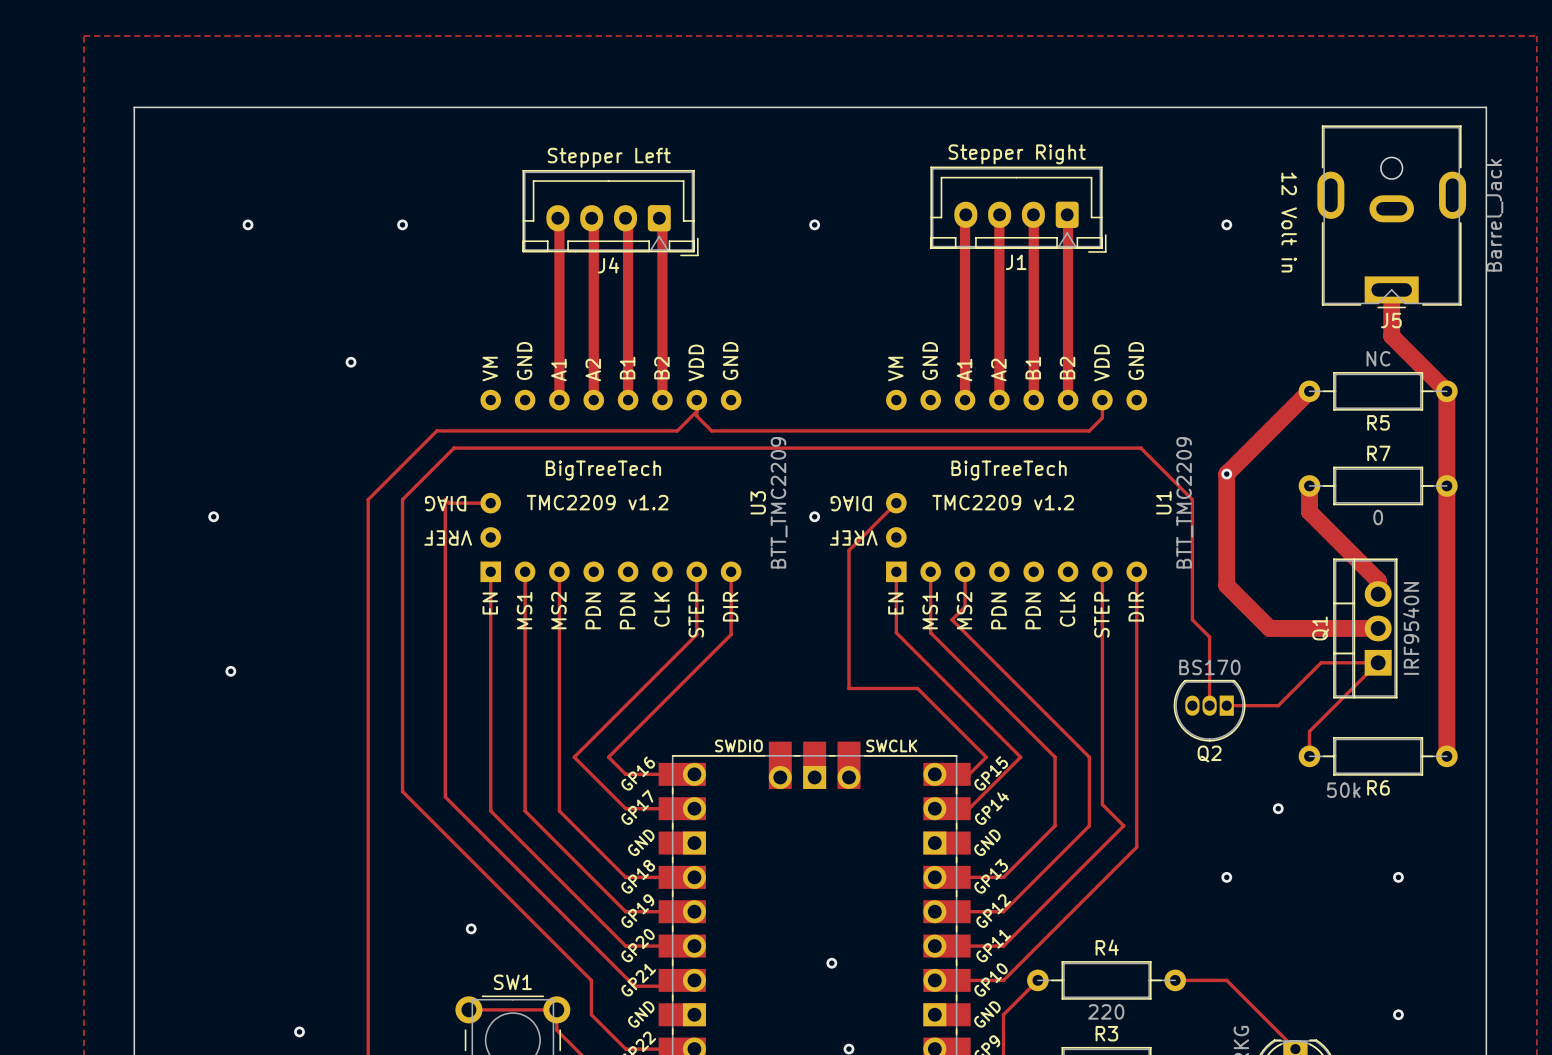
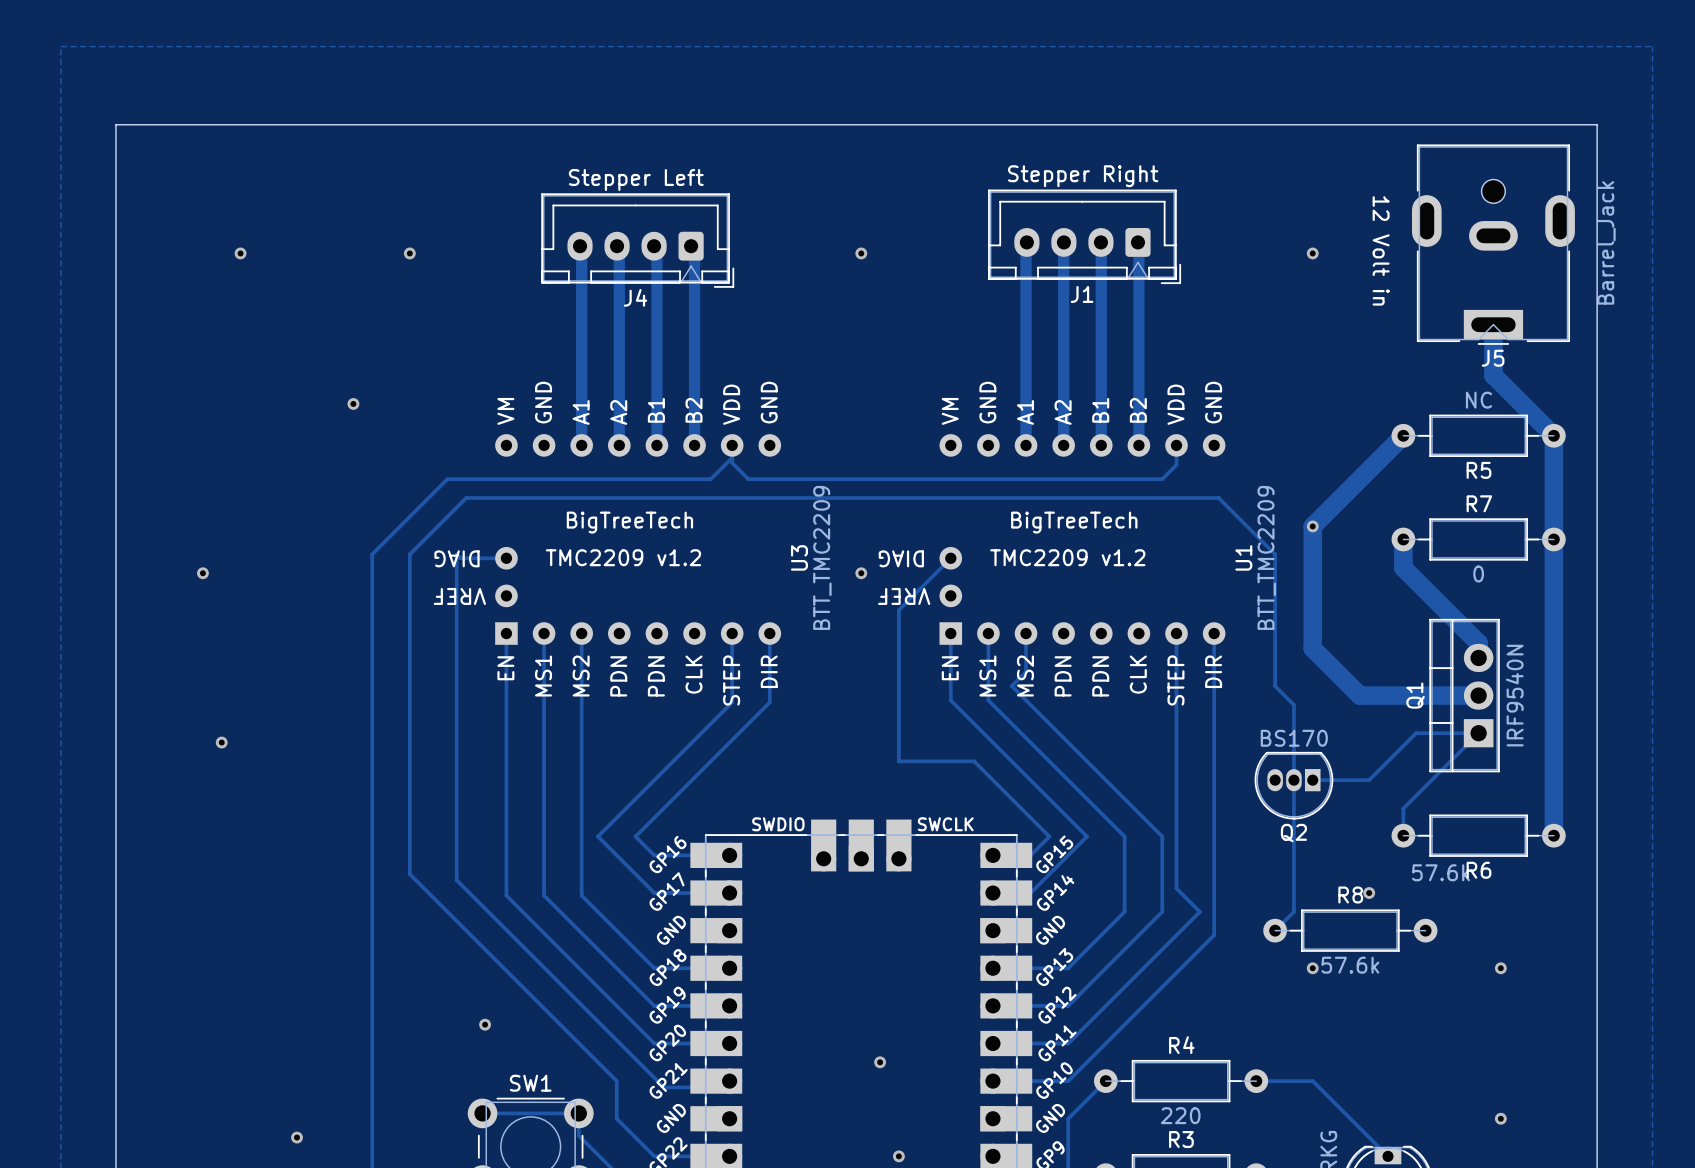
track: none -> (1293, 780) (1293, 911) (1275, 930)
R6 value: 50k (1343, 790) -> 57.6k (1441, 872)
R8: none -> 57.6k (1350, 930)

